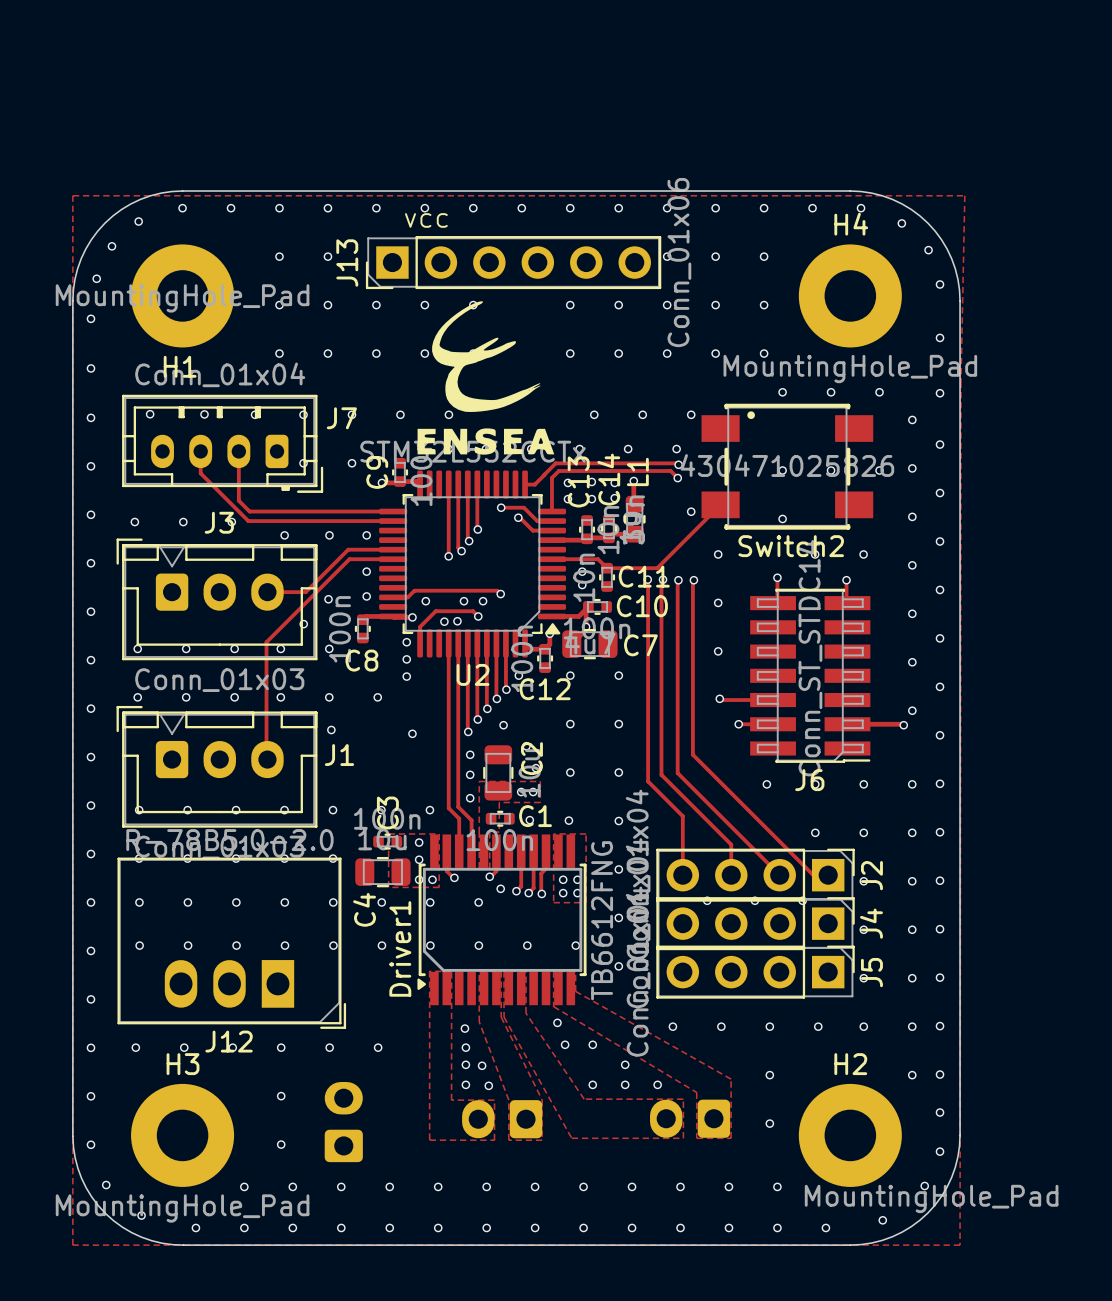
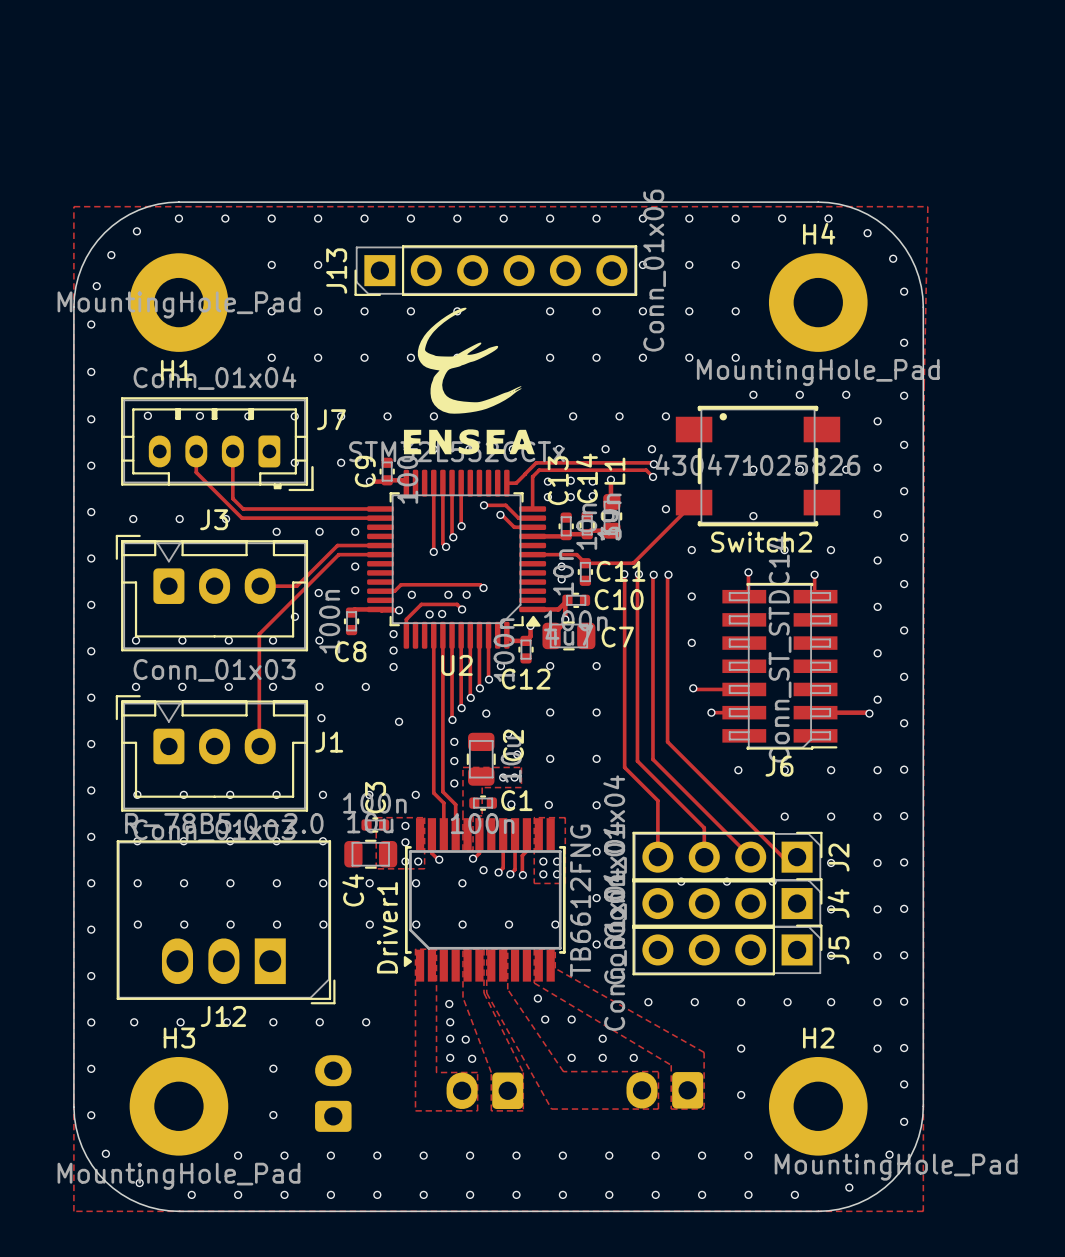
text: vcc (426, 220) -> none

